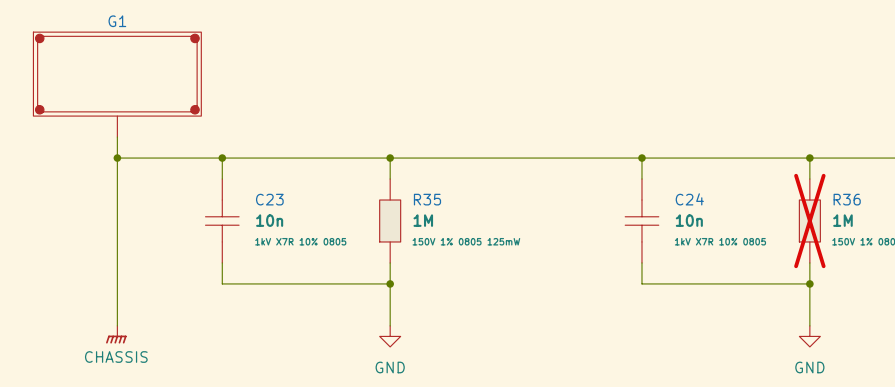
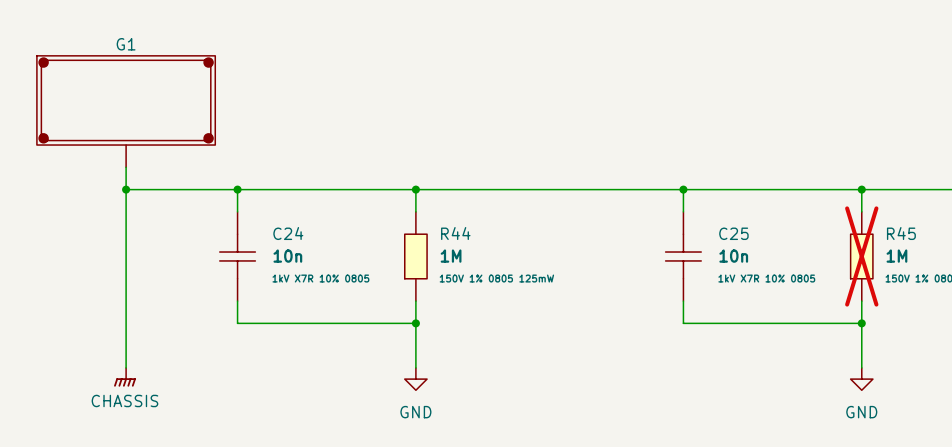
C23 name: C23 (269, 199) -> C24 (288, 233)
R35 name: R35 (427, 199) -> R44 (455, 233)
C24 name: C24 (689, 199) -> C25 (733, 233)
R36 name: R36 (847, 199) -> R45 (901, 233)

